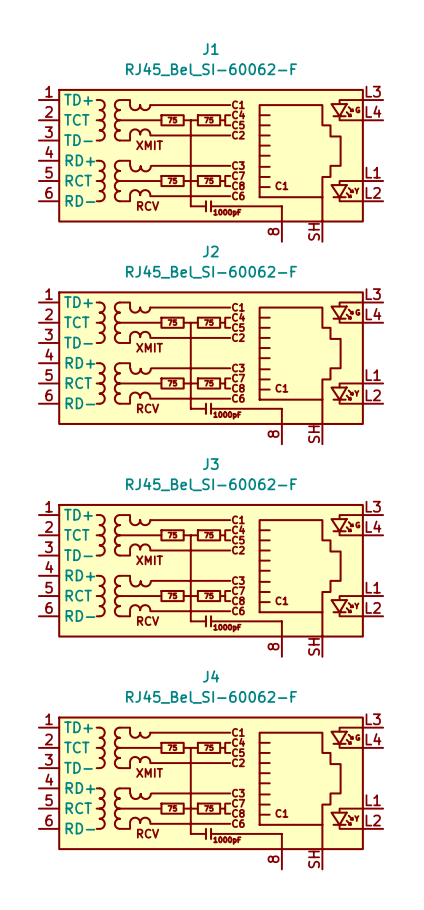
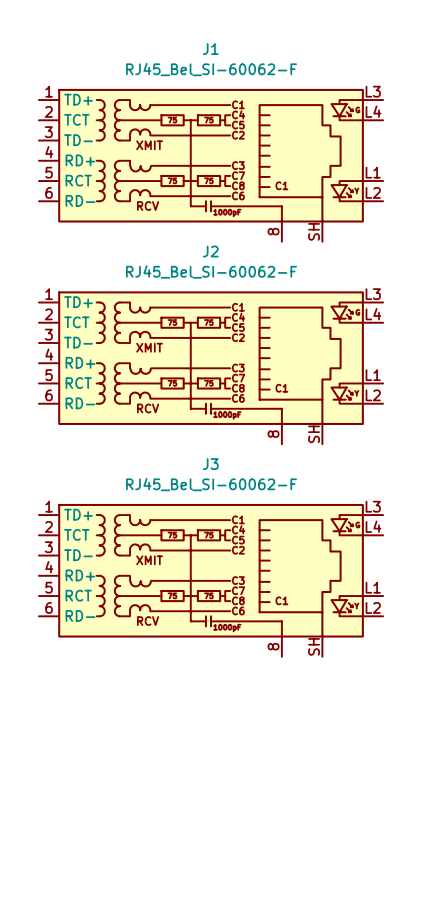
J4: RJ45_Bel_SI-60062-F (211, 792) -> none

